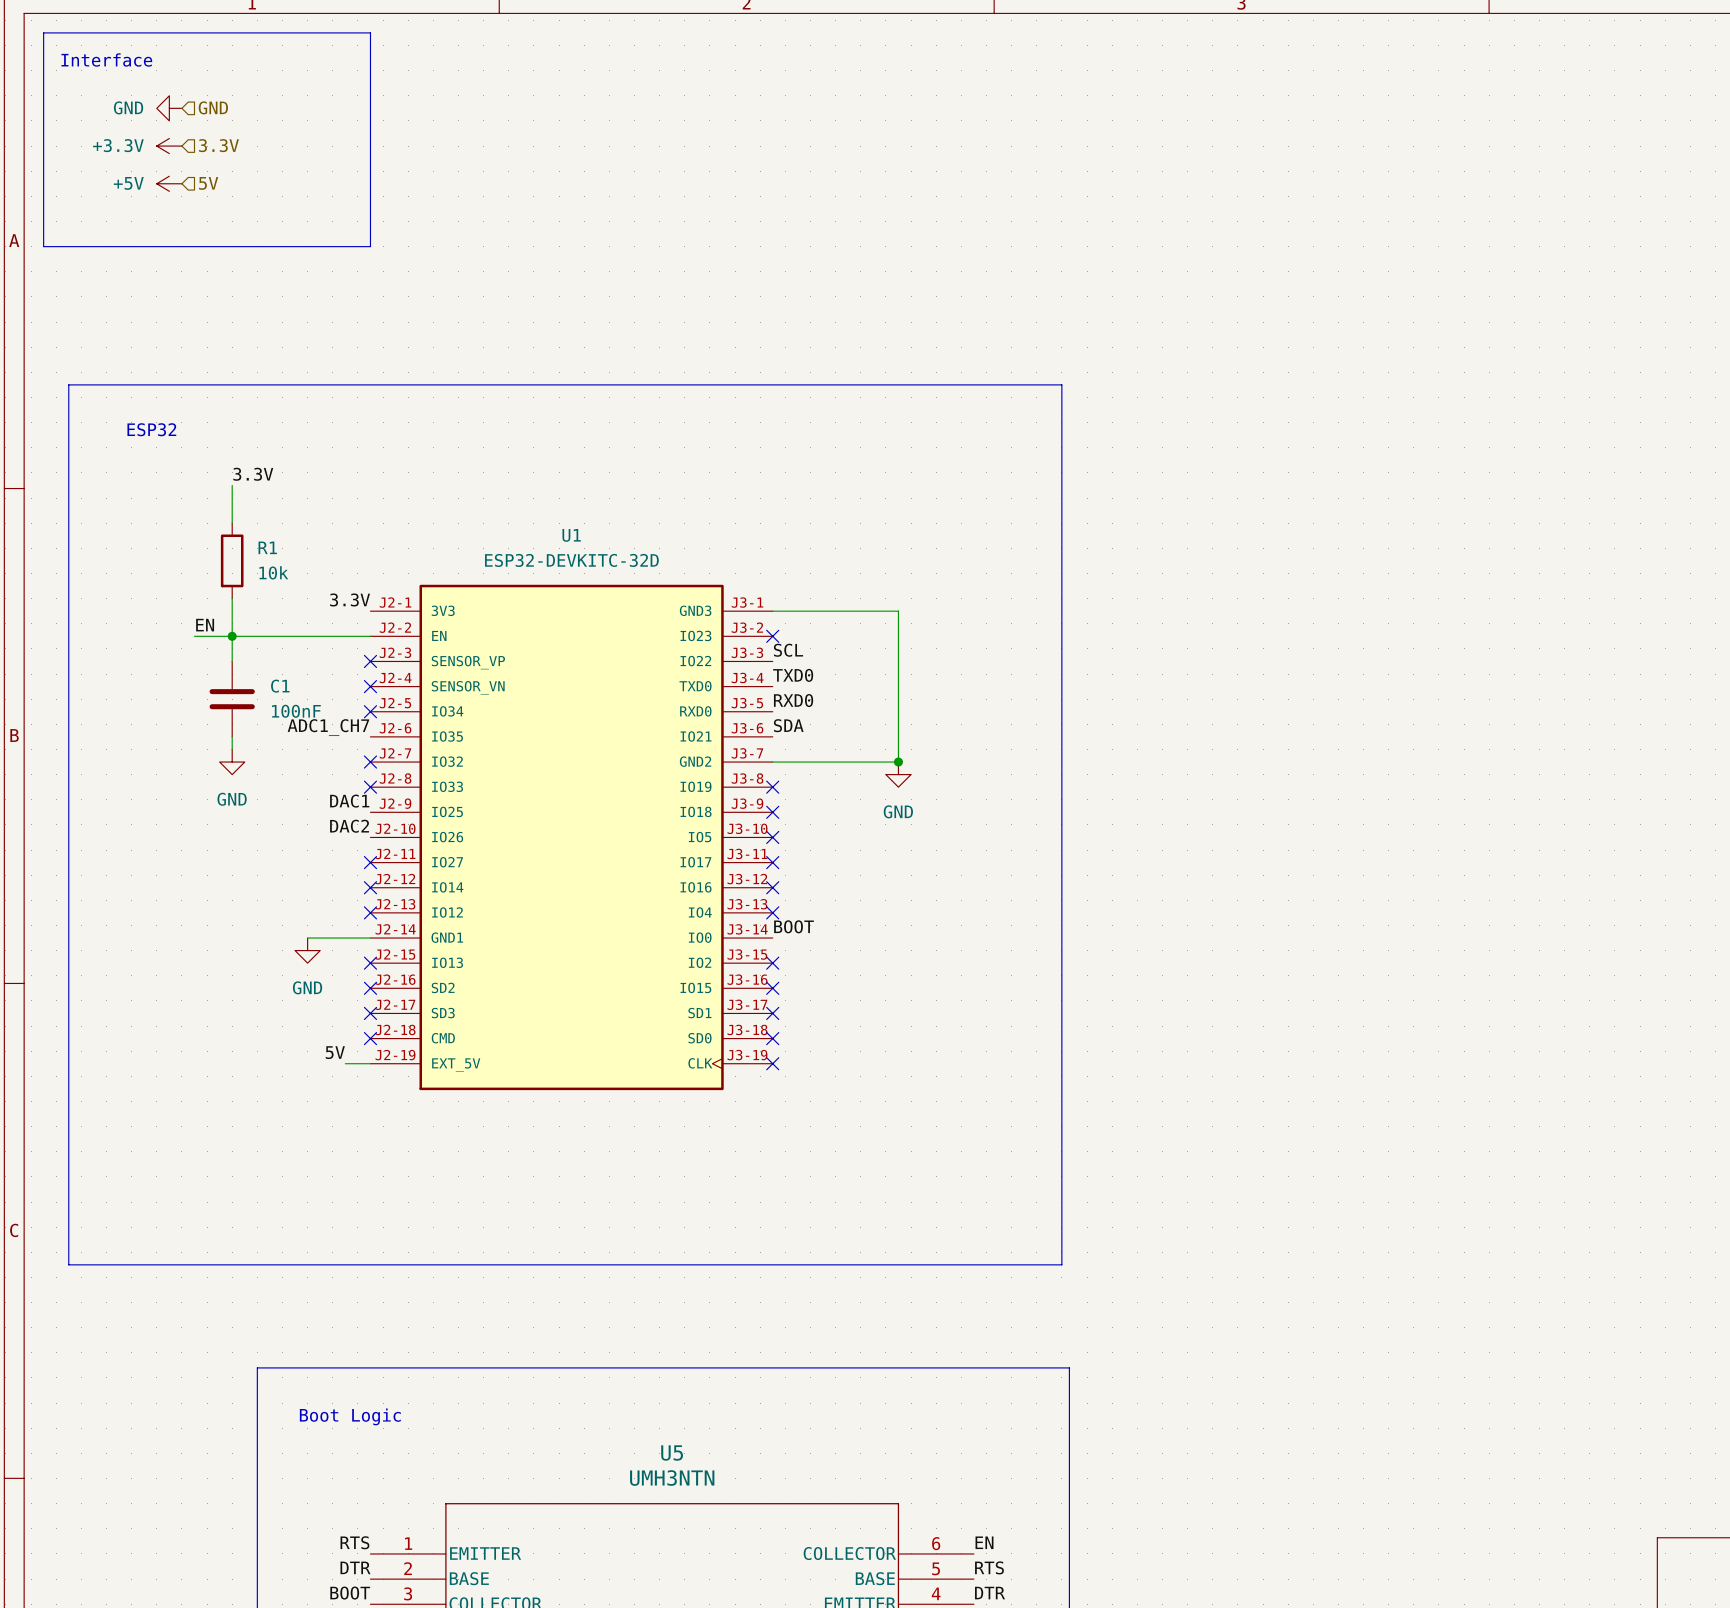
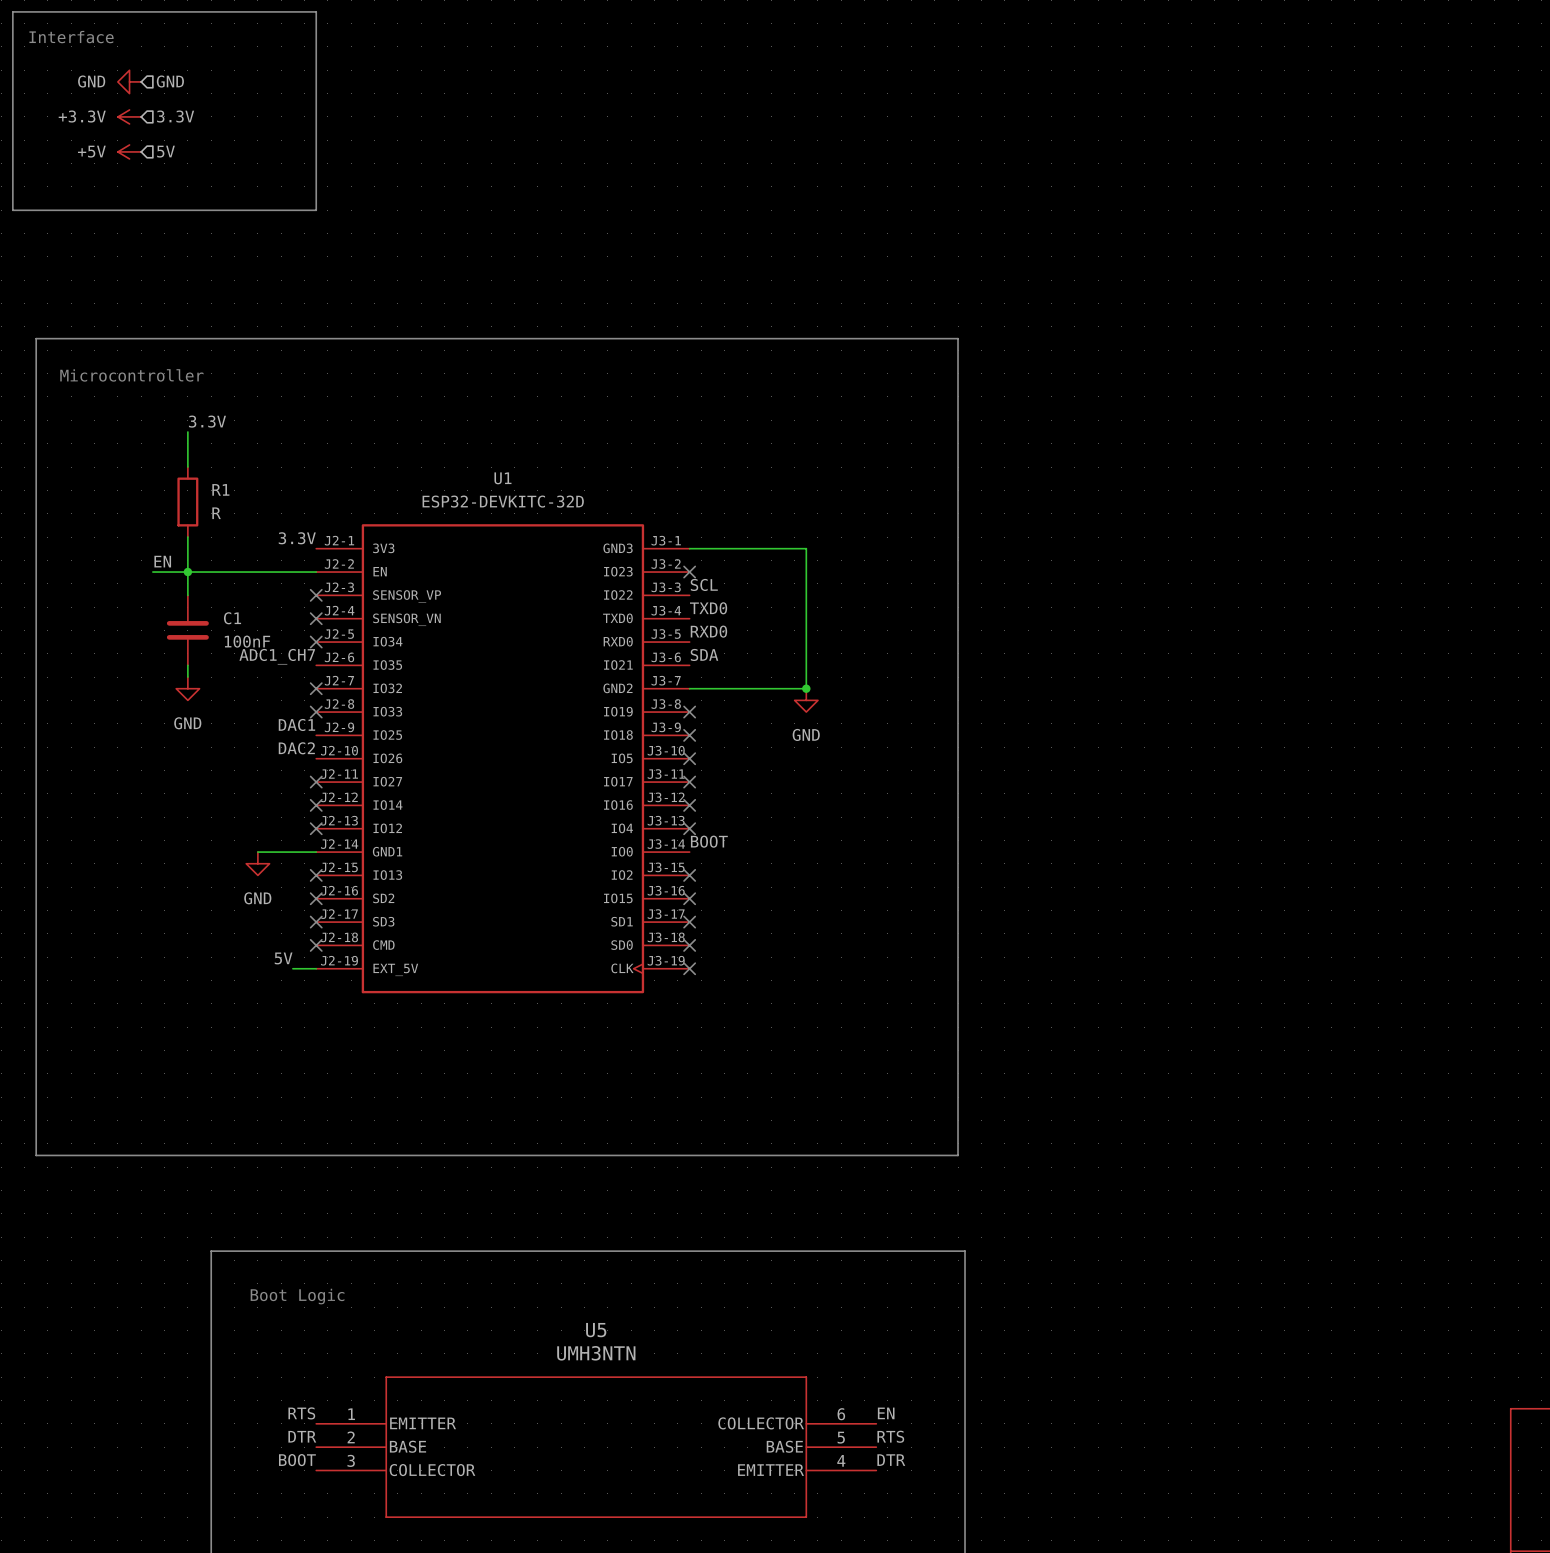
text: none -> Microcontroller (131, 375)
text: ESP32 (151, 429) -> none
R1 value: 10k (273, 572) -> R (216, 513)

